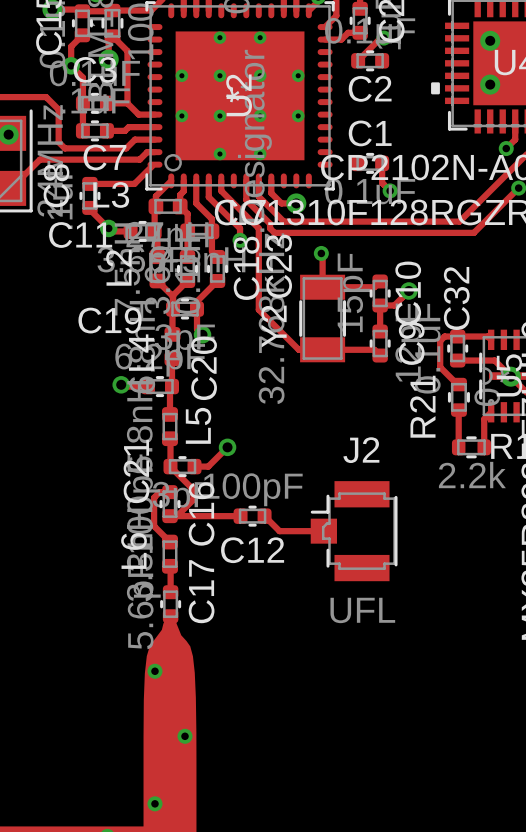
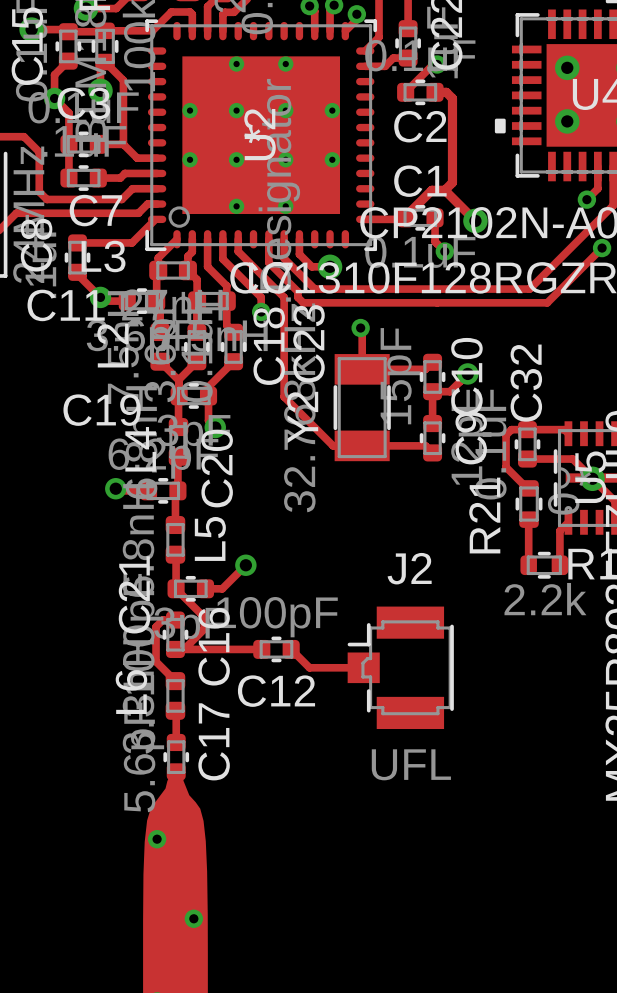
track: none -> (435, 92) (446, 92) (452, 98) (452, 182) (444, 190)
track: none -> (444, 190) (431, 190) (404, 219) (365, 219)
track: none -> (444, 190) (475, 220)
via: none -> (475, 220)

